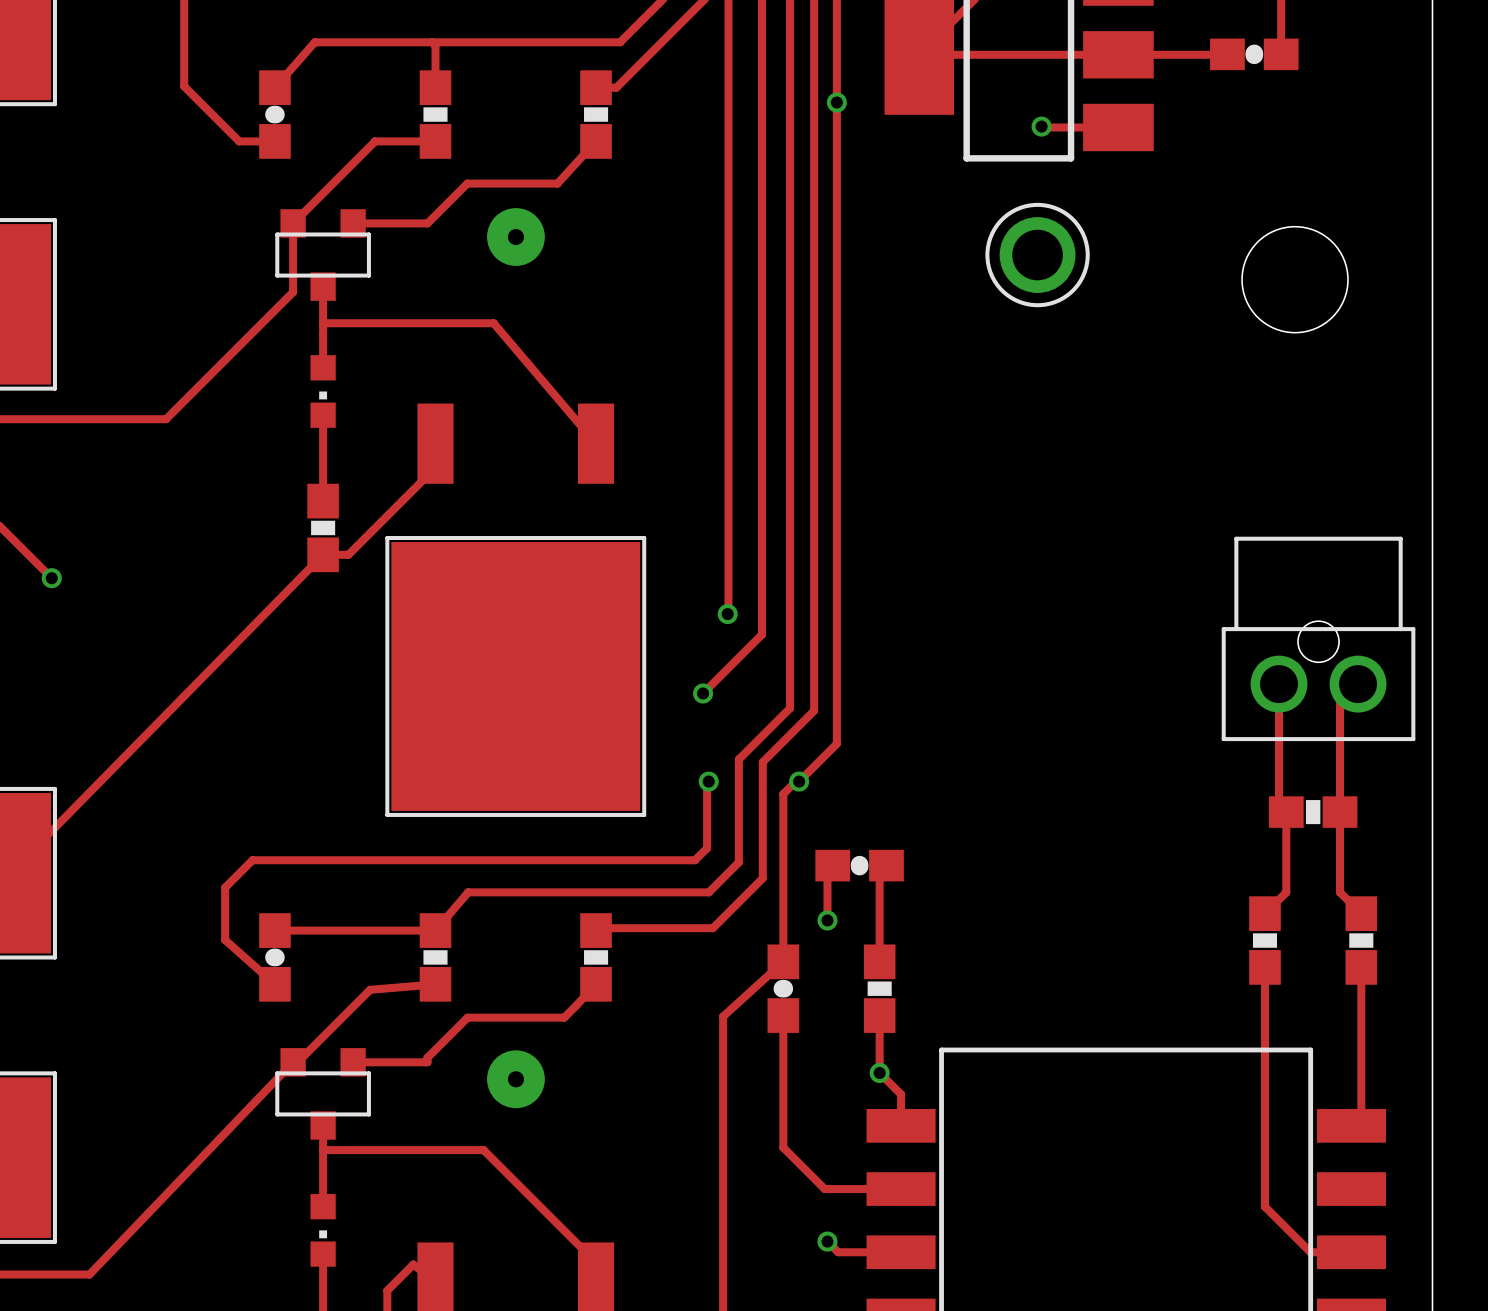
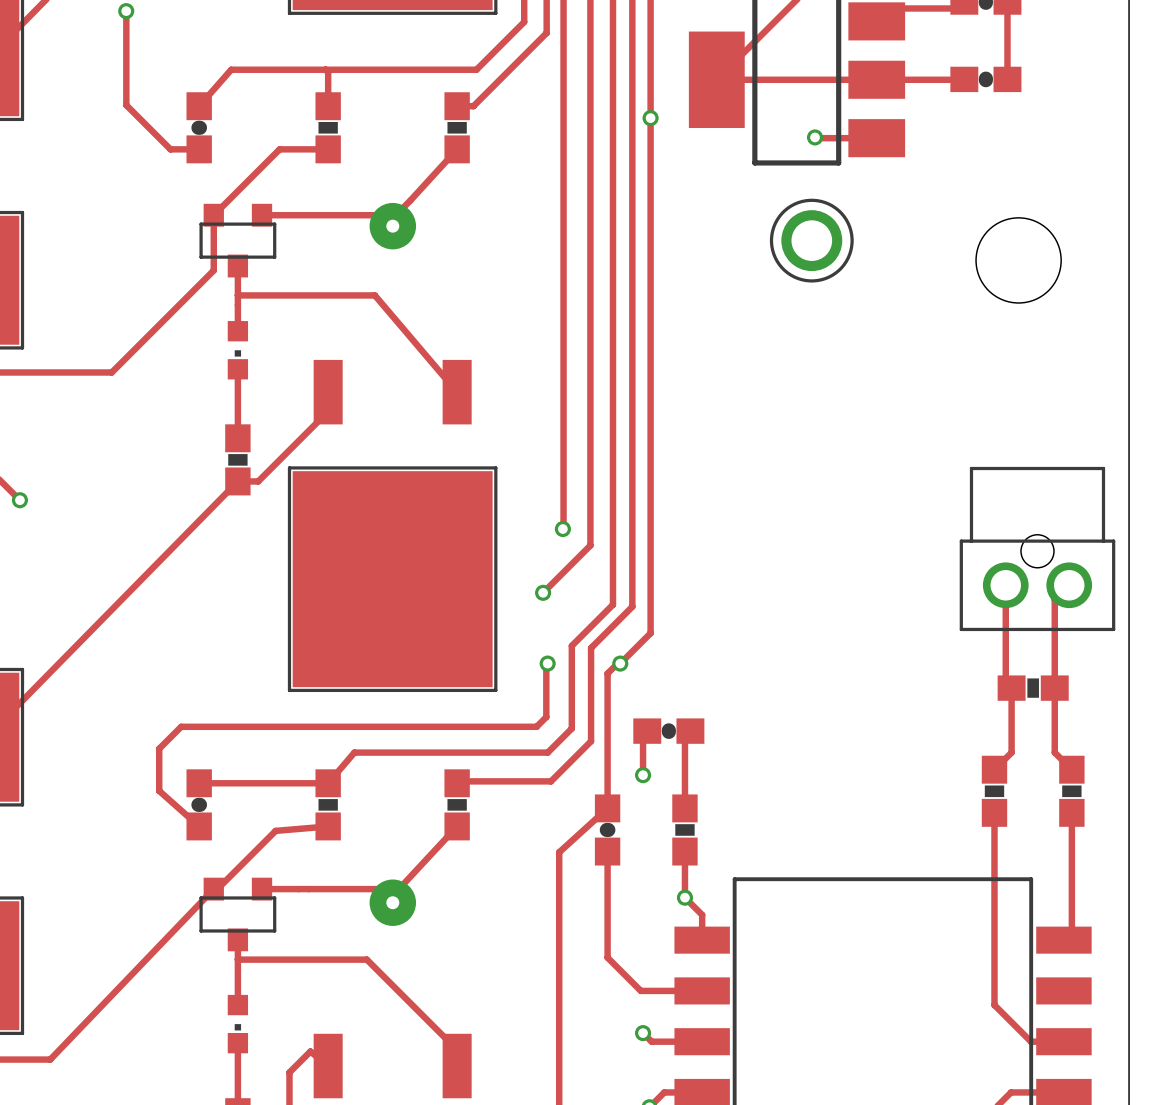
track: (557, 183) (467, 183) (427, 223) -> (426, 183) (395, 215) (321, 215)
track: (575, 1006) (564, 1017) (467, 1017) (427, 1057) (427, 1062) -> (440, 844) (398, 889) (321, 889)

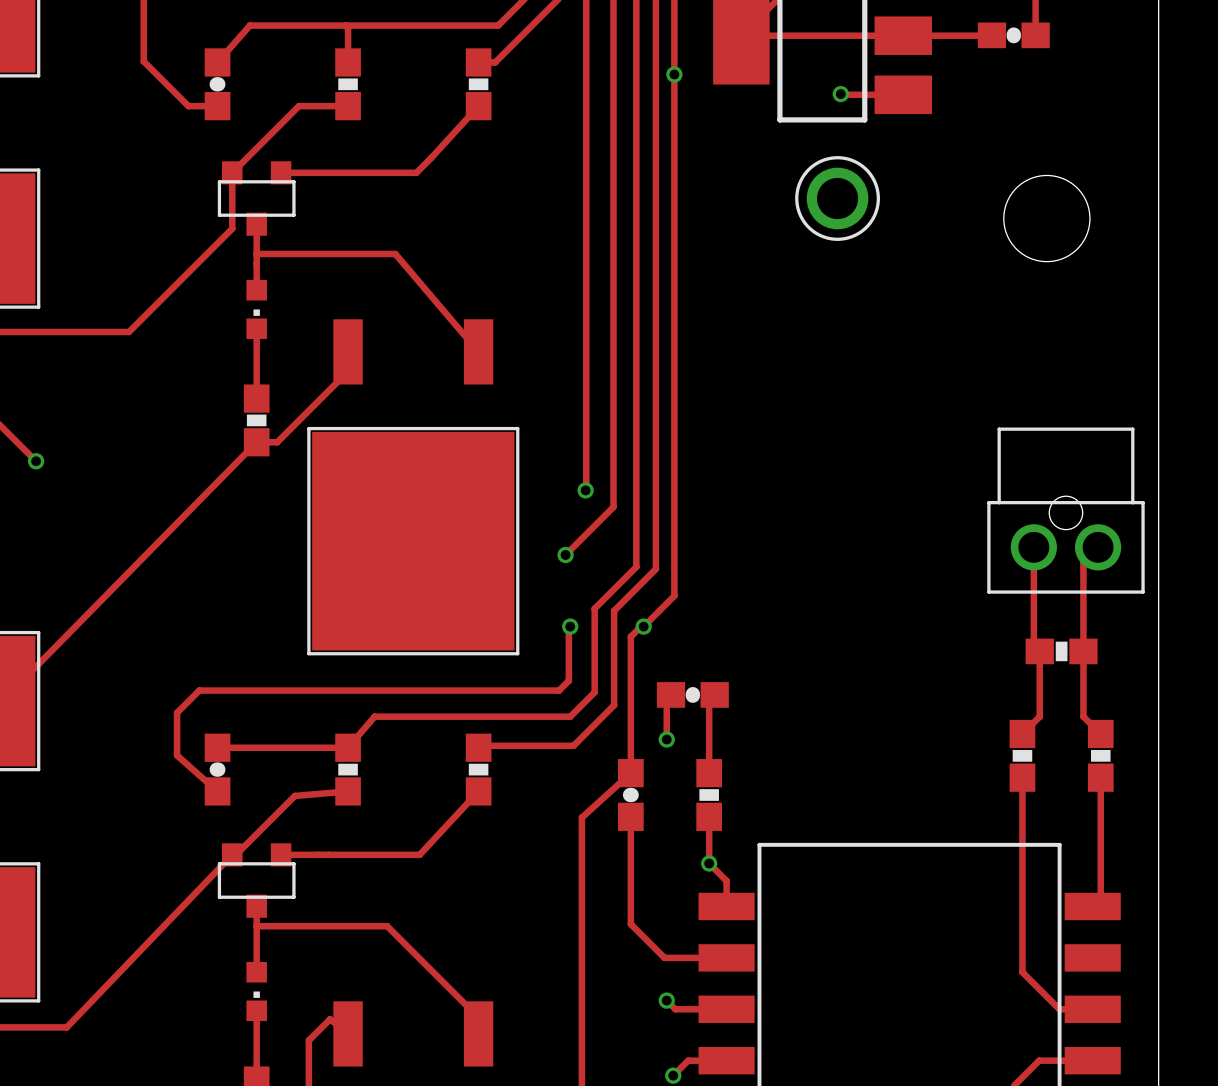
part: (392, 226) -> none
part: (392, 902) -> none

